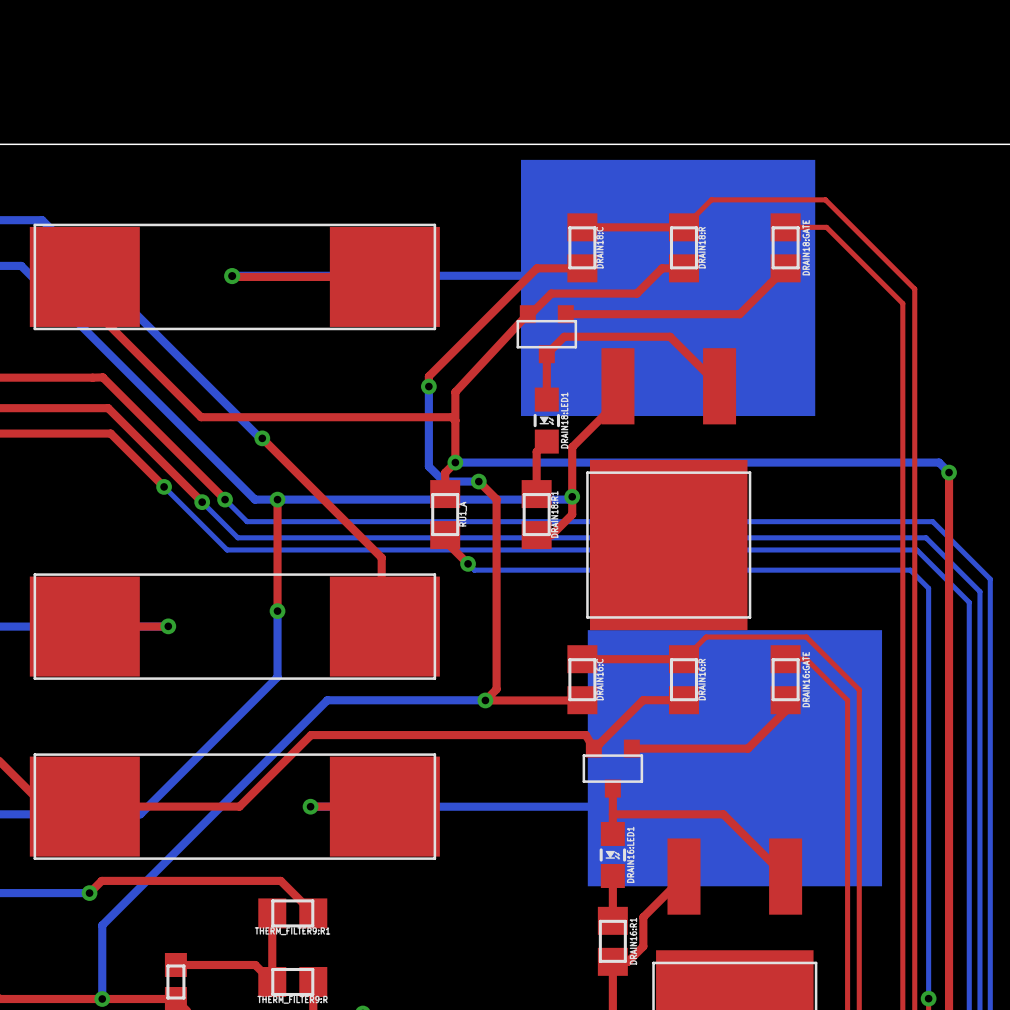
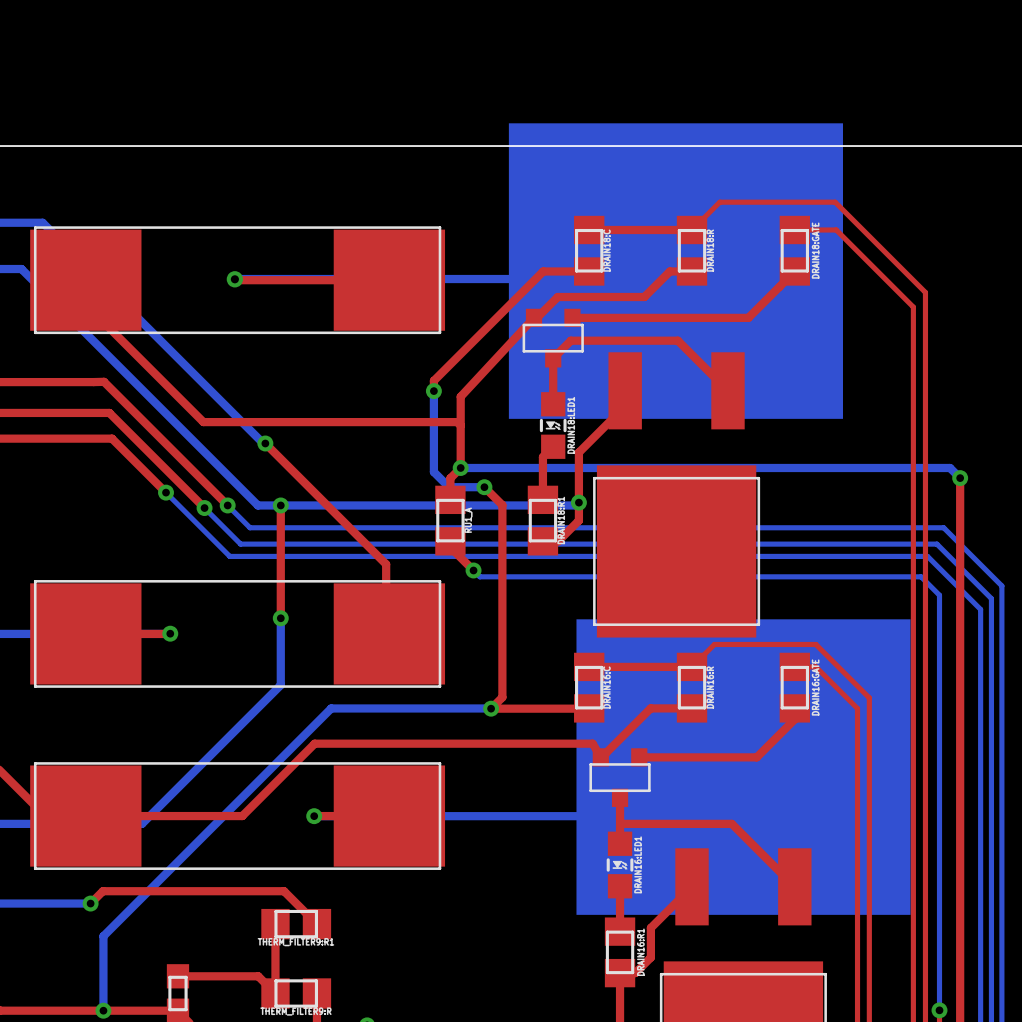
part footprint: [520, 159, 816, 417] -> [508, 123, 843, 419]
part footprint: [587, 630, 883, 887] -> [576, 619, 911, 915]

